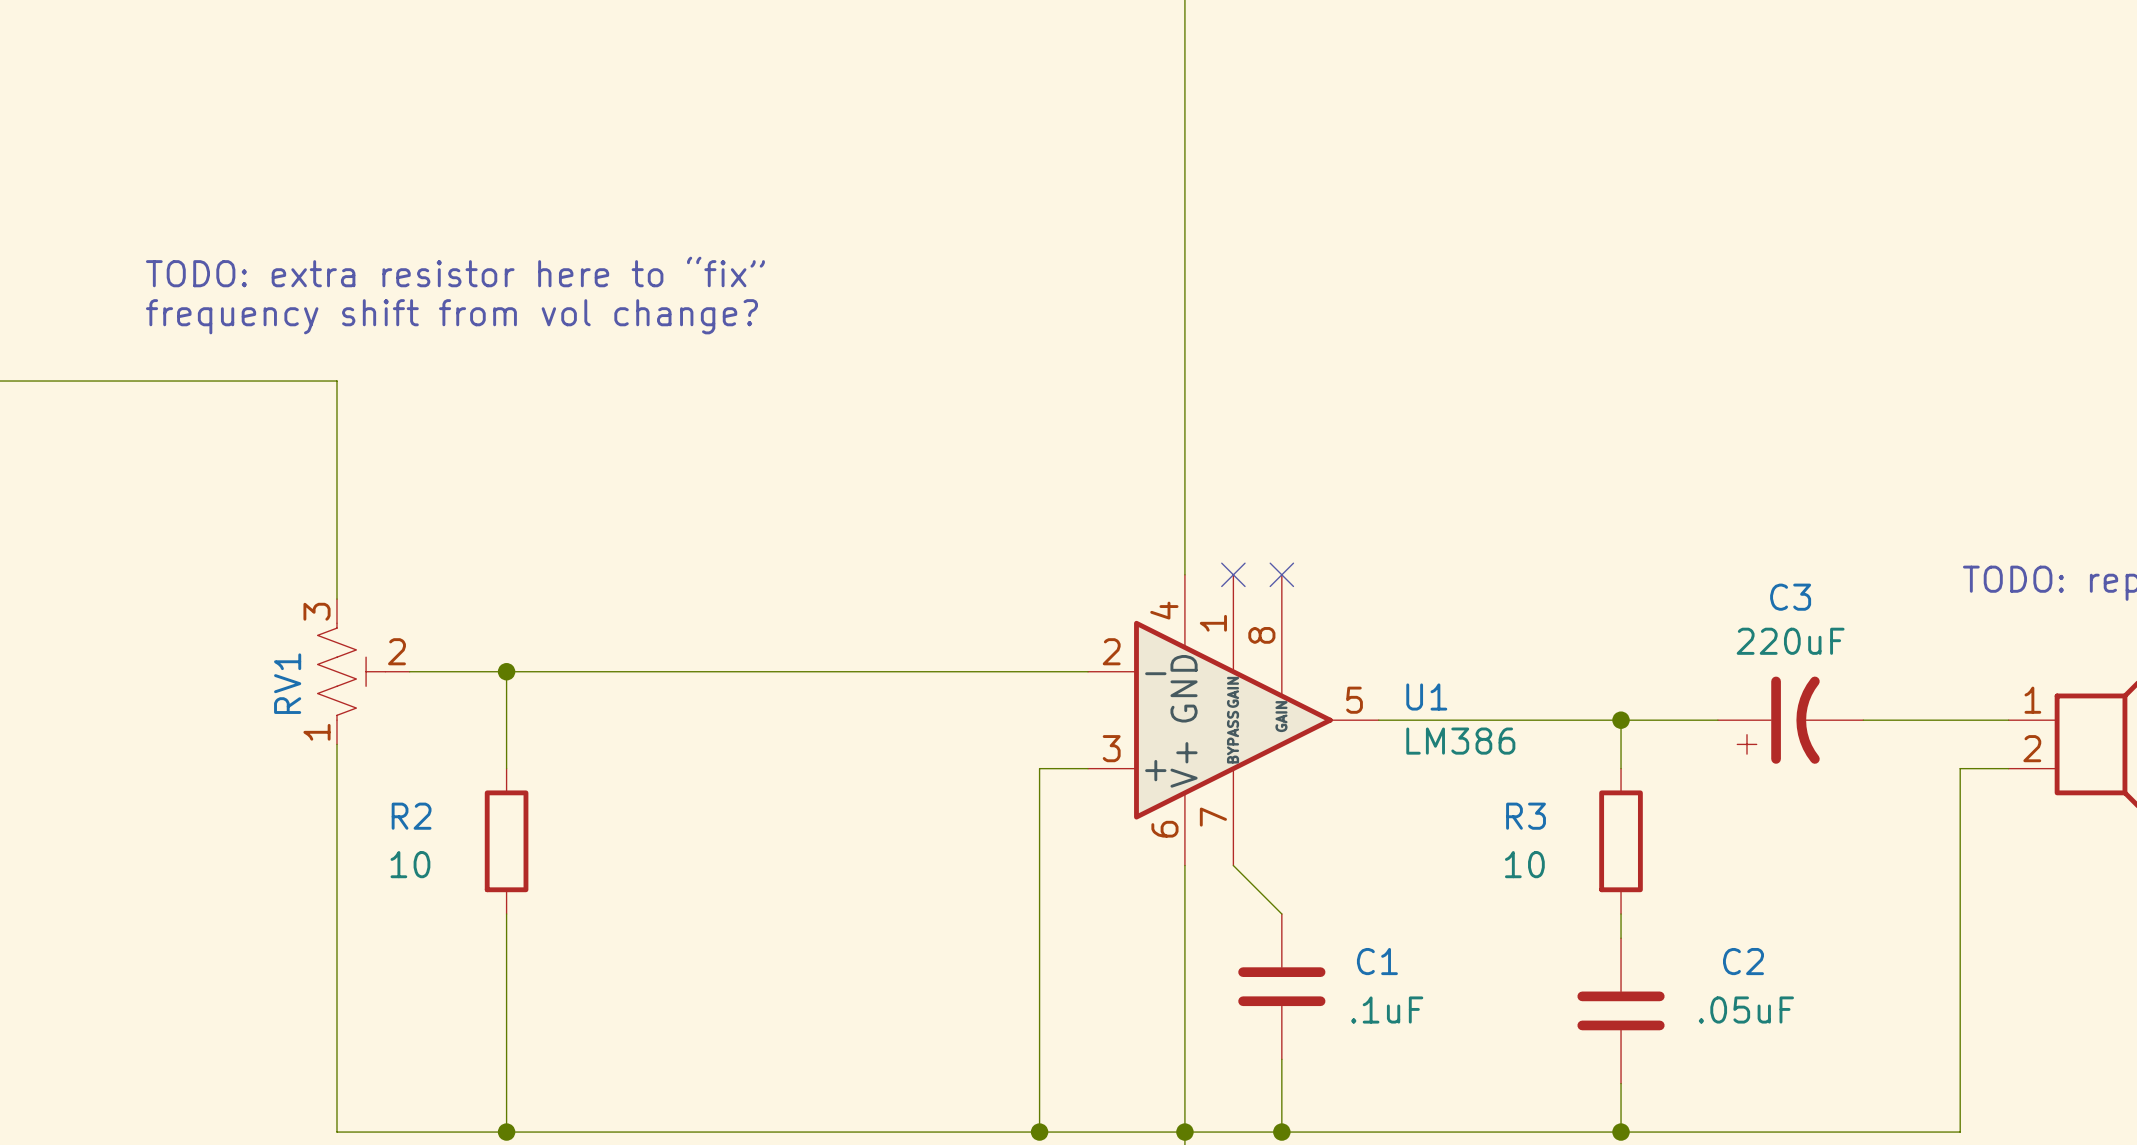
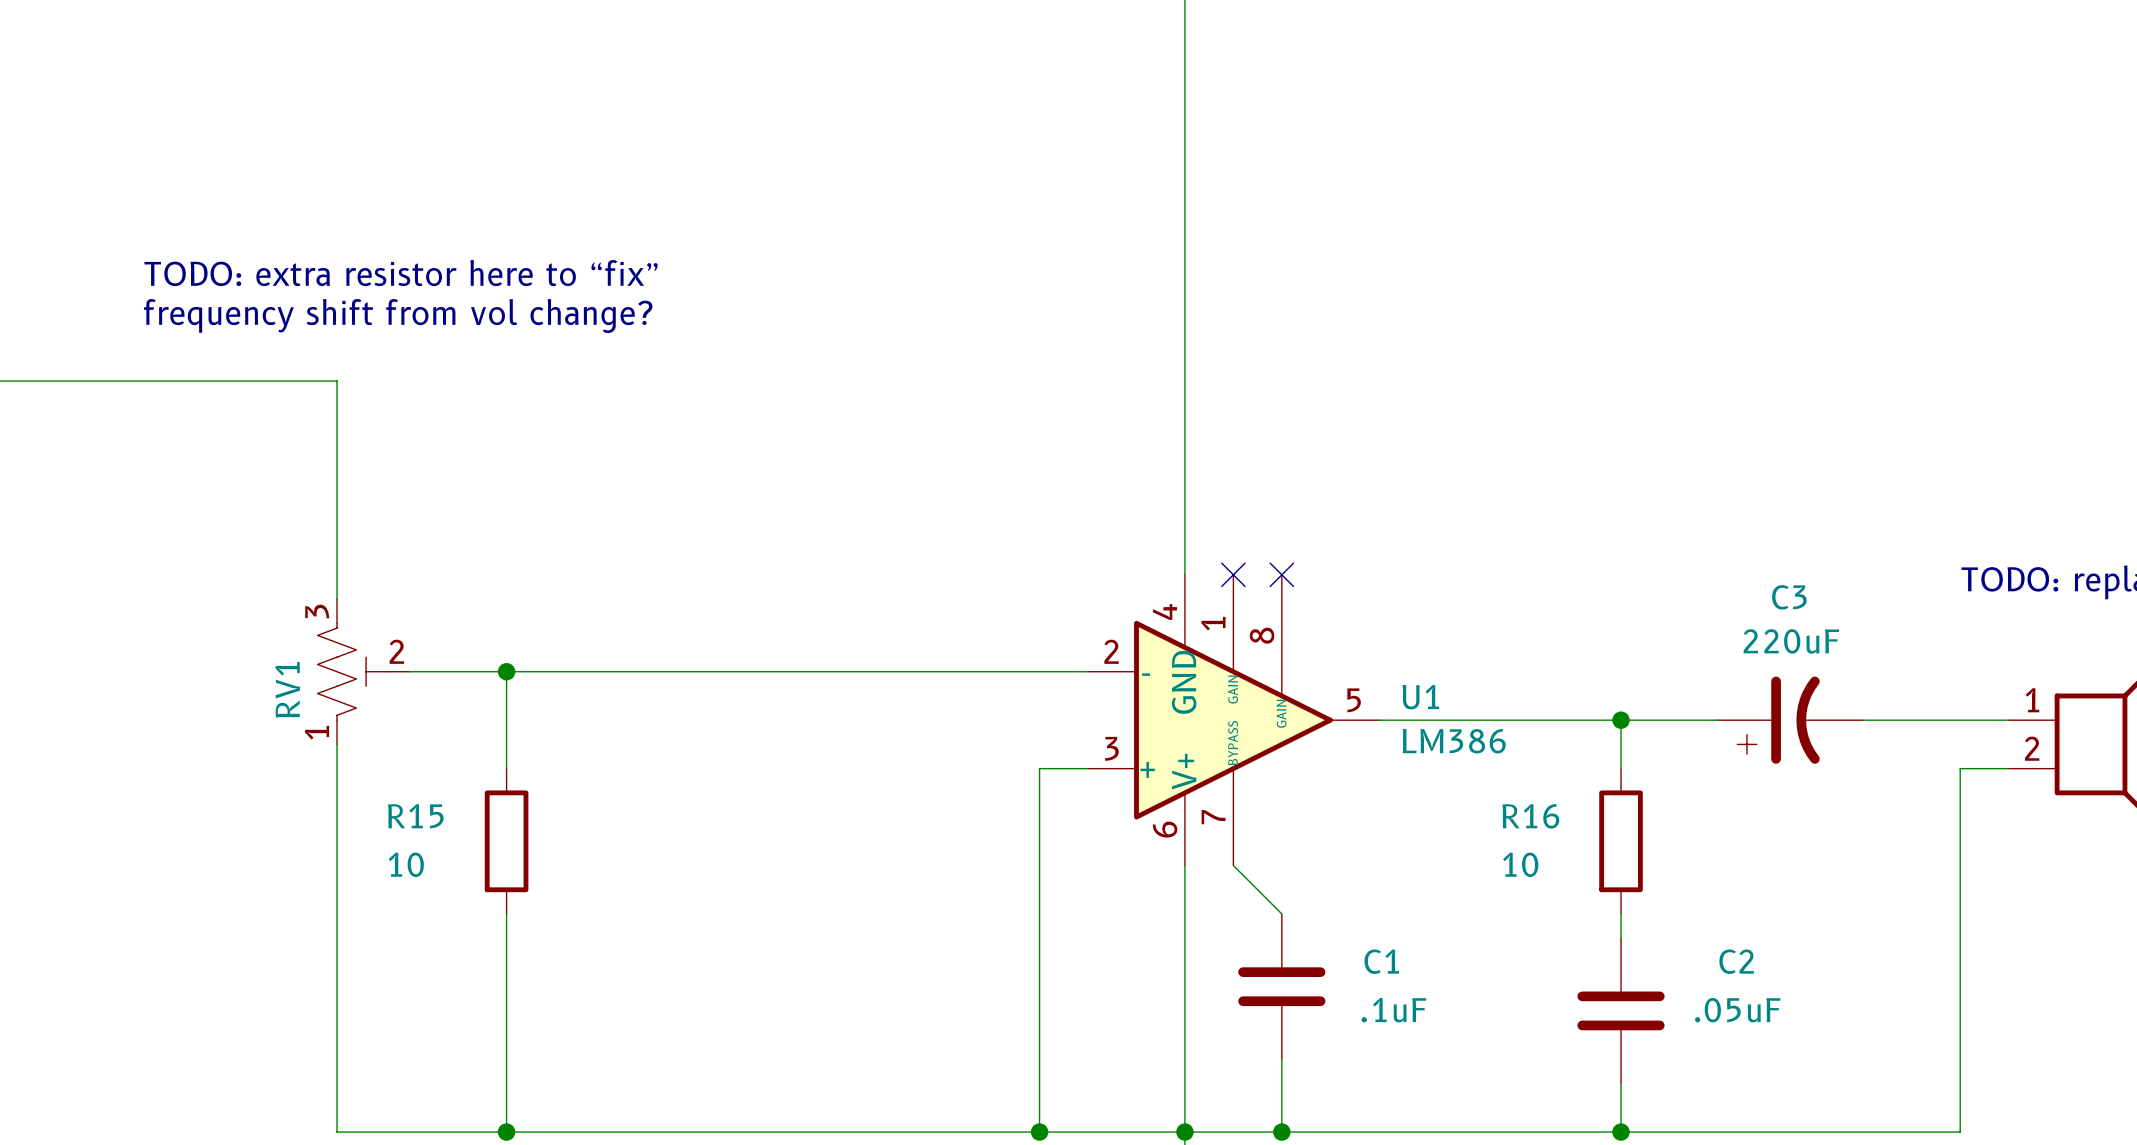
R2 name: R2 (411, 816) -> R15 (415, 816)
R3 name: R3 (1526, 816) -> R16 (1530, 816)

